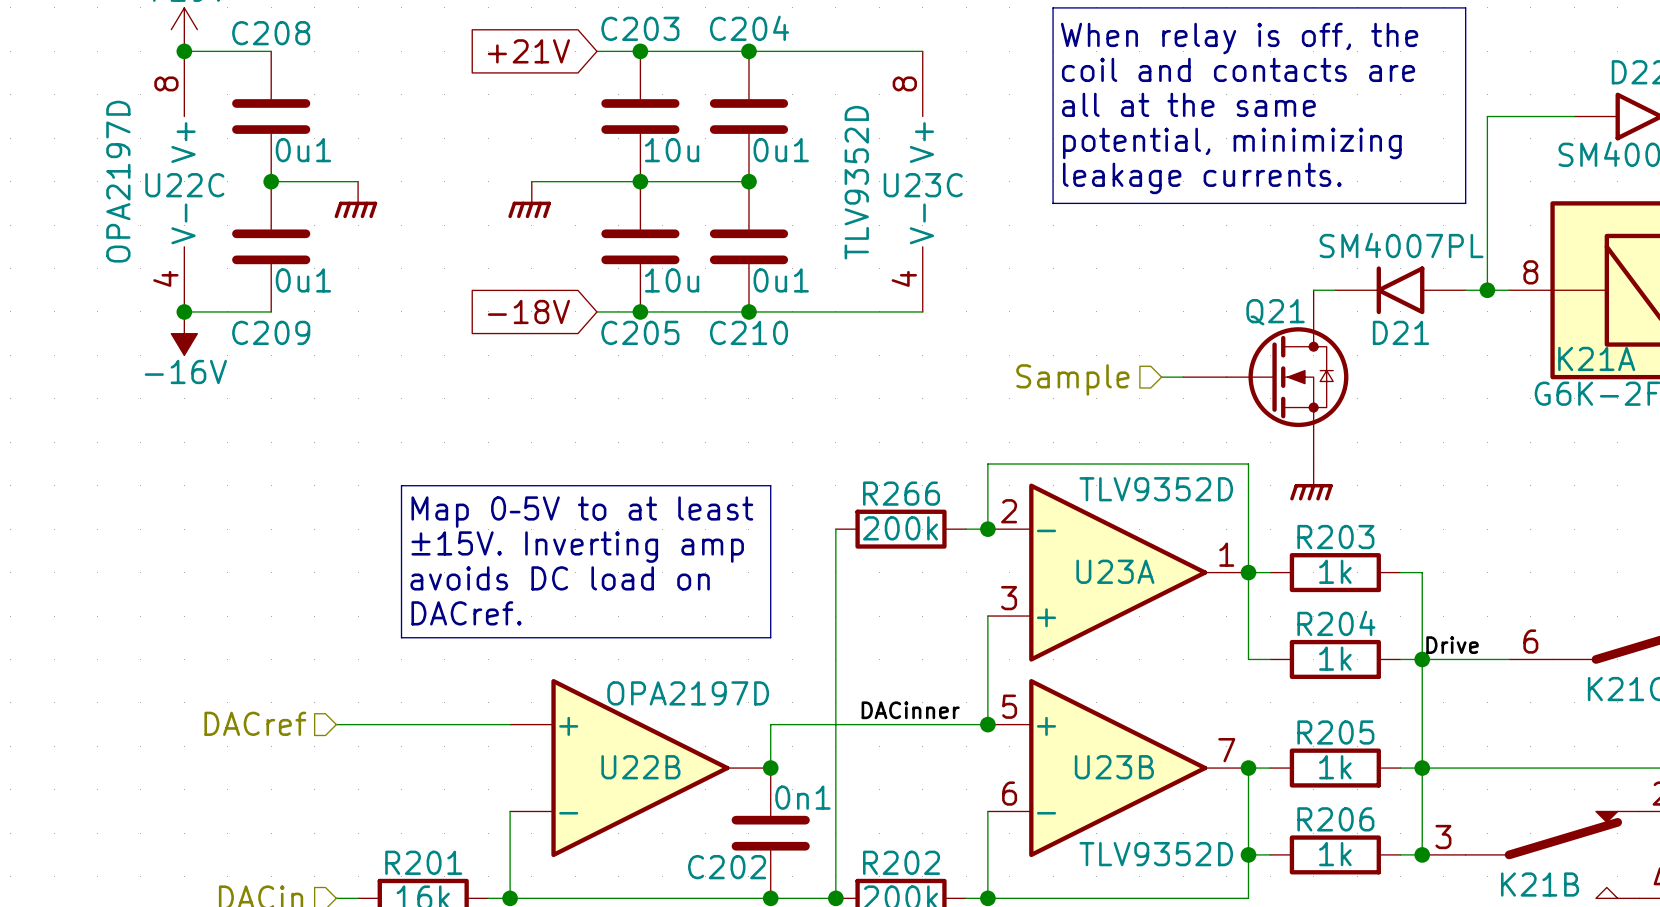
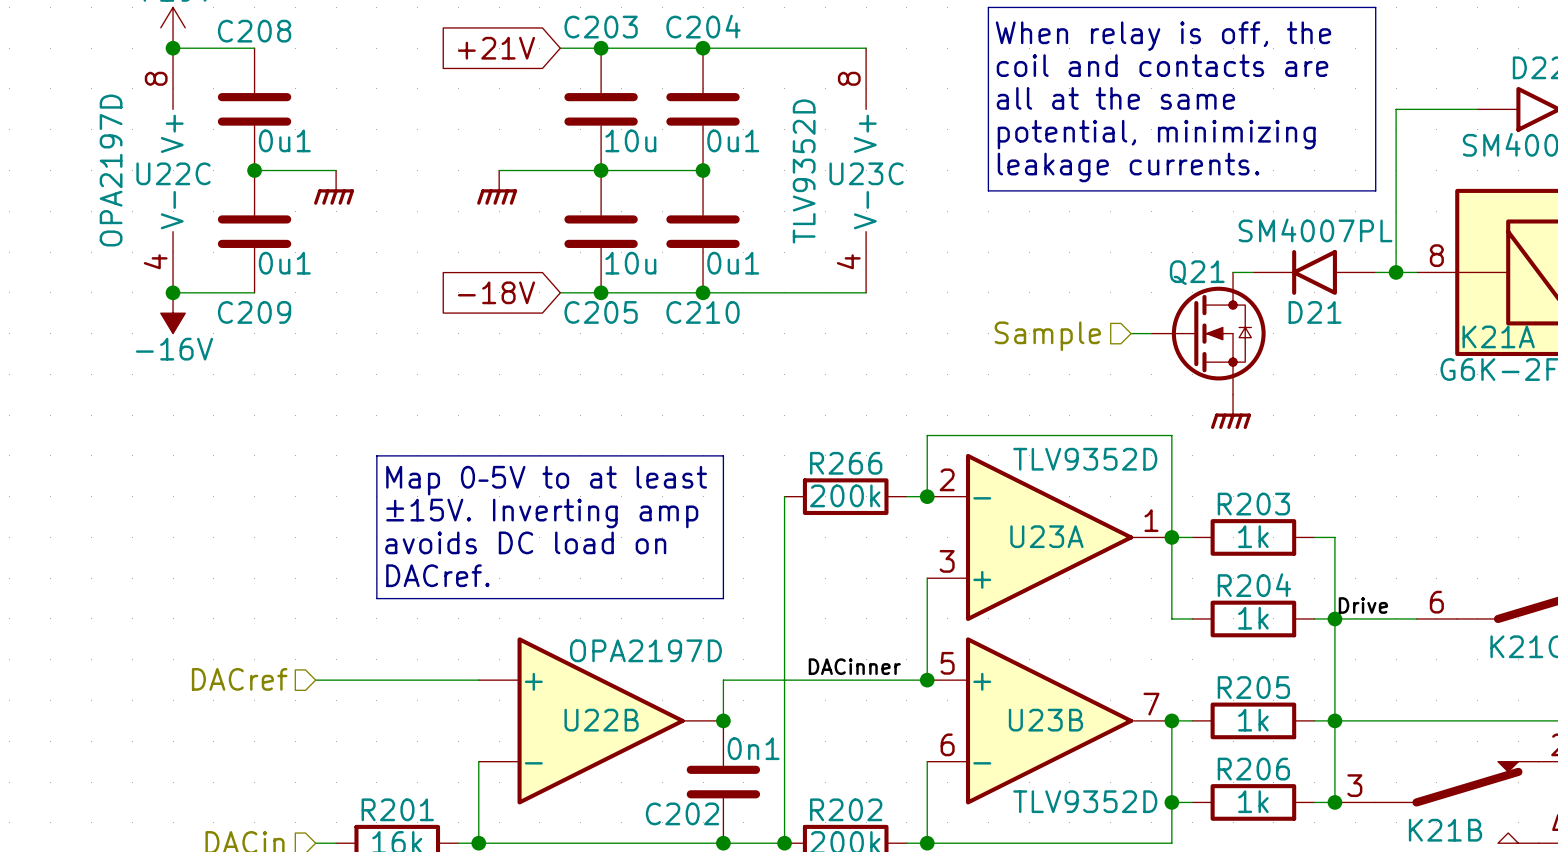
Q21 symbol: [1183, 290, 1349, 465] -> [1151, 272, 1266, 395]
wire: (1161, 377) (1183, 377) -> (1131, 333) (1151, 333)
hierarchical label position: Sample (1072, 379) -> Sample (1047, 336)
power symbol position: (1311, 482) -> (1230, 411)

